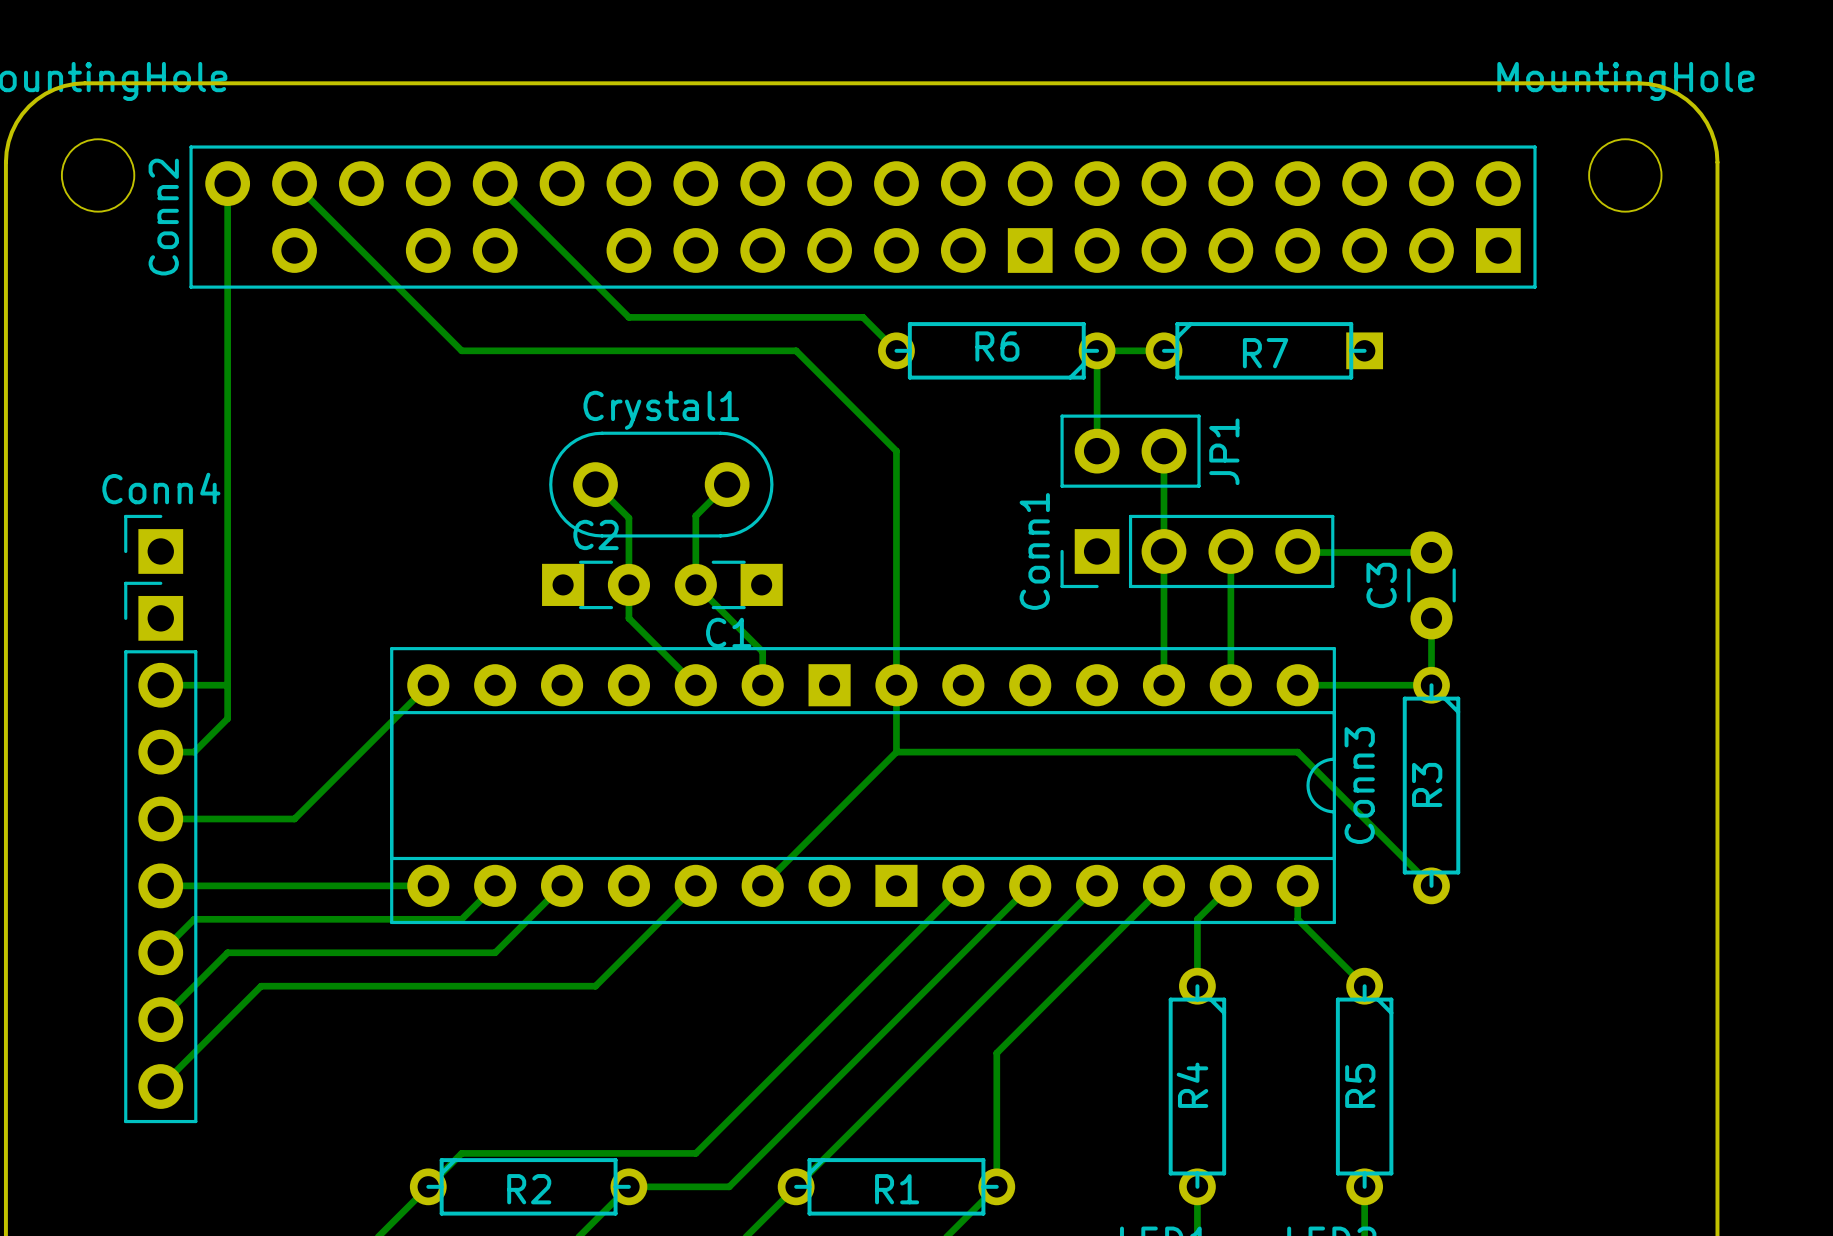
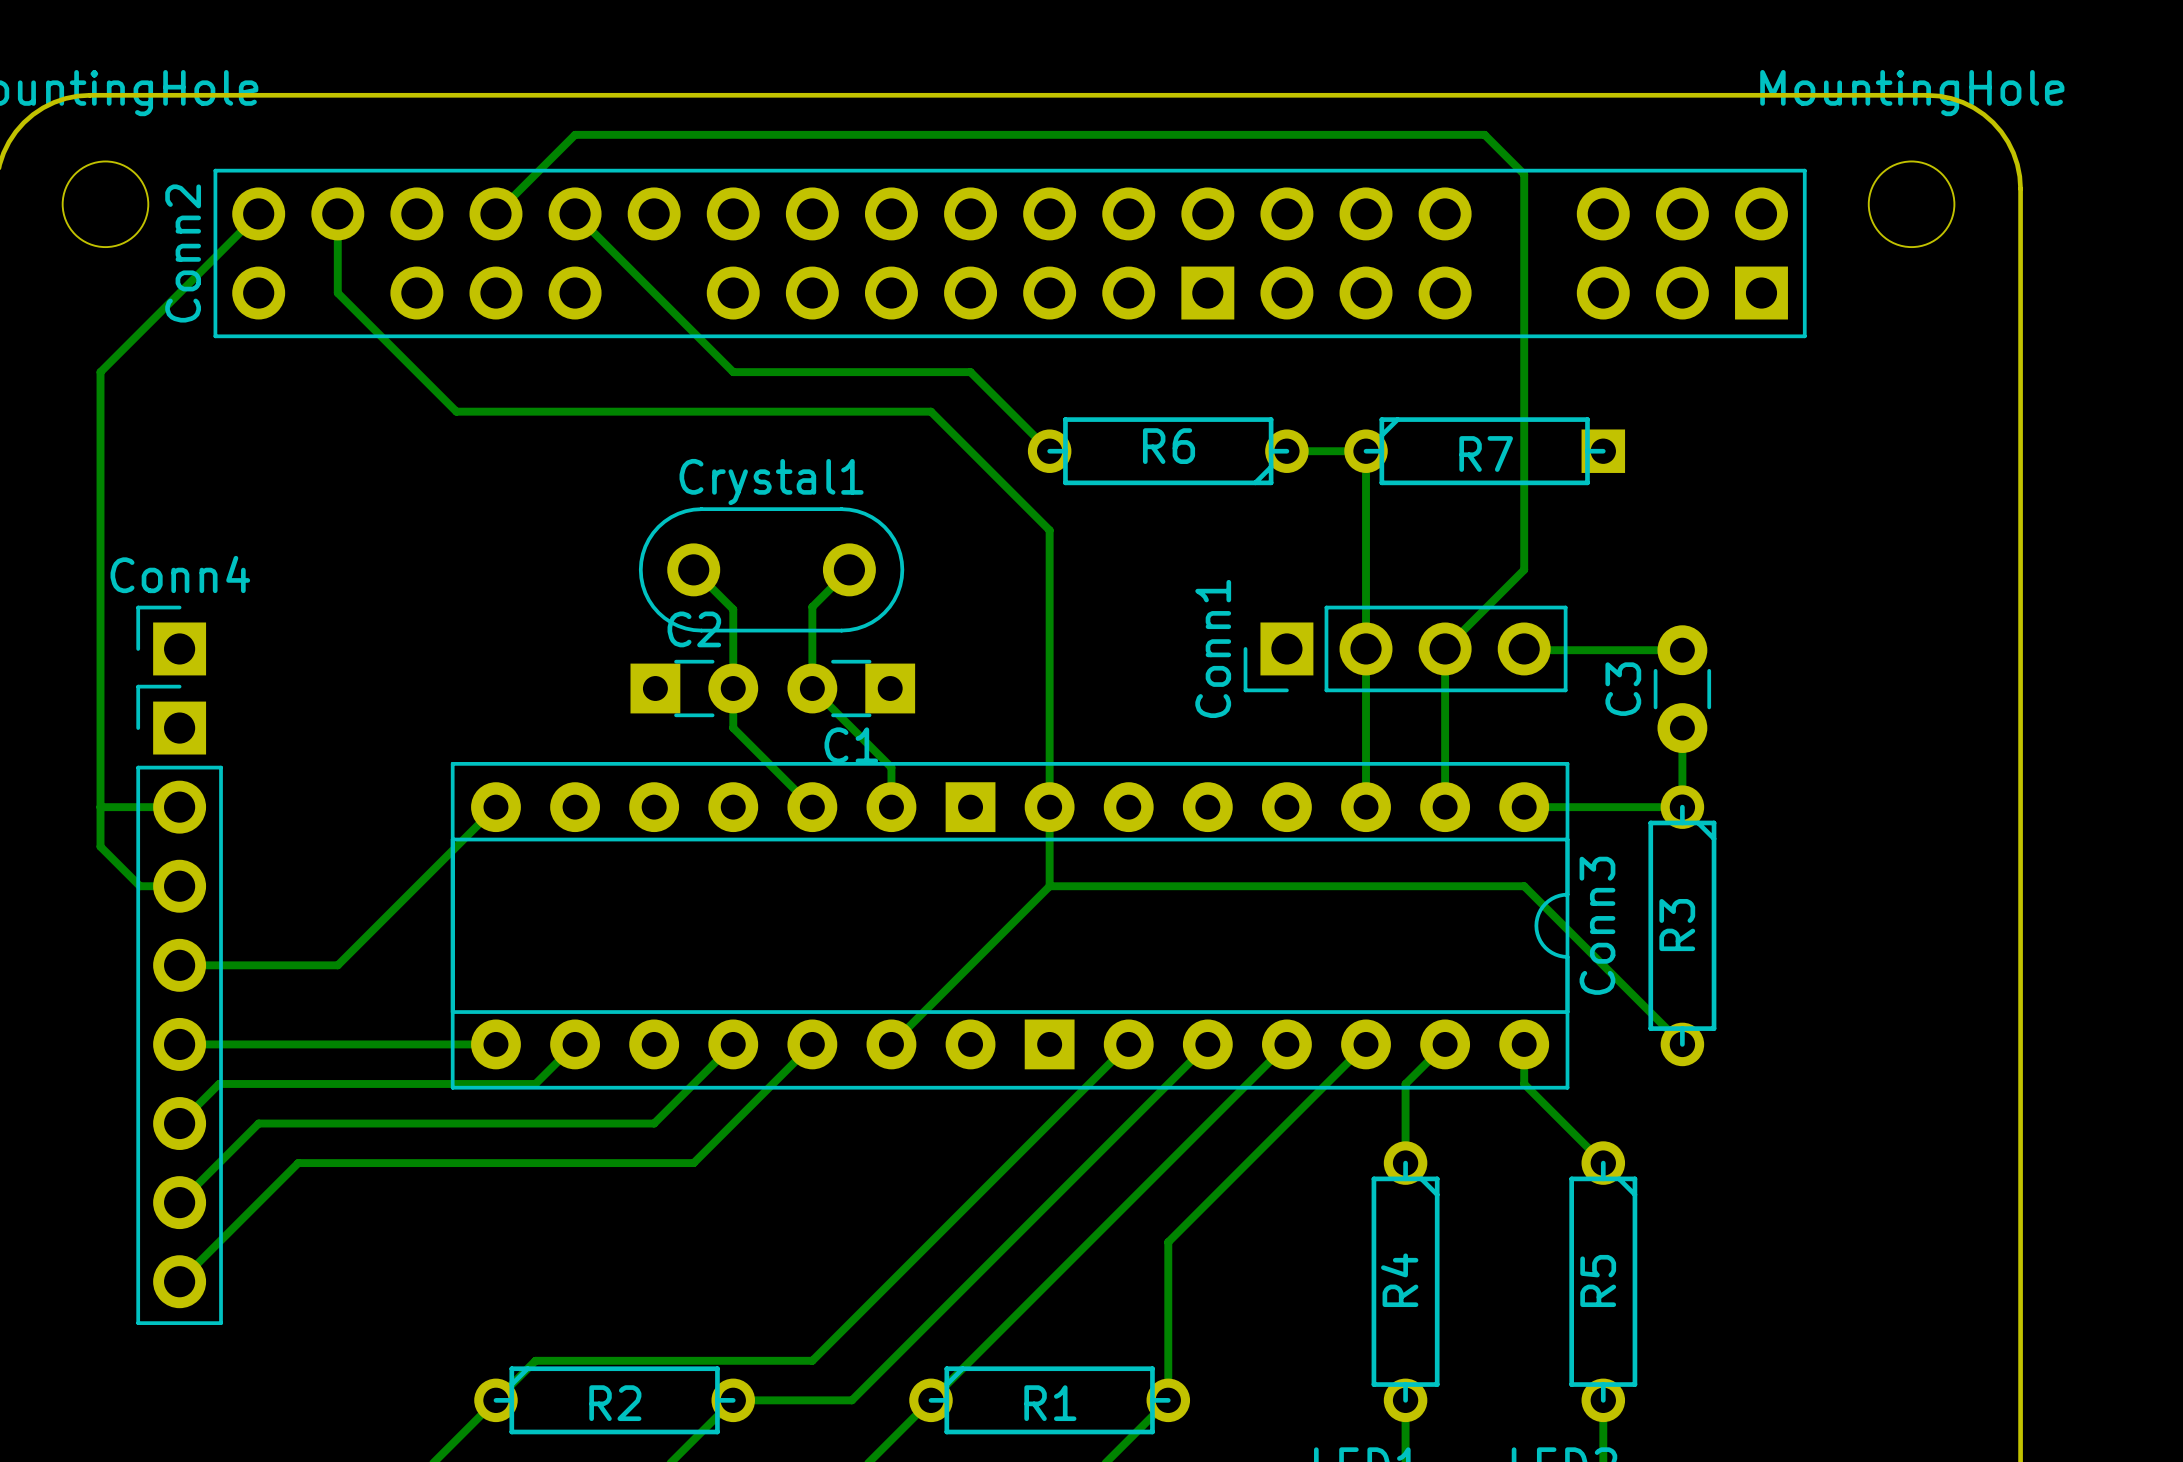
Conn2 footprint: [189, 145, 1537, 289] -> [213, 168, 1807, 339]
bottom track: (227, 183) (227, 718) (194, 752) (160, 752) -> (258, 213) (100, 372) (100, 846) (140, 886) (179, 886)
bottom track: (294, 183) (461, 350) -> (337, 213) (337, 293) (456, 411) (535, 411)
bottom track: none -> (495, 213) (575, 134) (1484, 134) (1524, 174) (1524, 569) (1445, 648)
bottom track: (829, 317) (863, 317) (896, 350) -> (970, 372) (1049, 451)
R6 position: (996, 350) -> (1168, 451)
bottom track: (1163, 350) (1097, 350) (1097, 451) -> none
R7 position: (1264, 350) -> (1484, 451)
bottom track: none -> (1286, 451) (1366, 451) (1366, 530)
JP1: (1130, 451) -> none
bottom track: (160, 685) (227, 685) -> (179, 807) (100, 807)
bottom track: (562, 885) (495, 952) -> (733, 1044) (654, 1123) (575, 1123)

